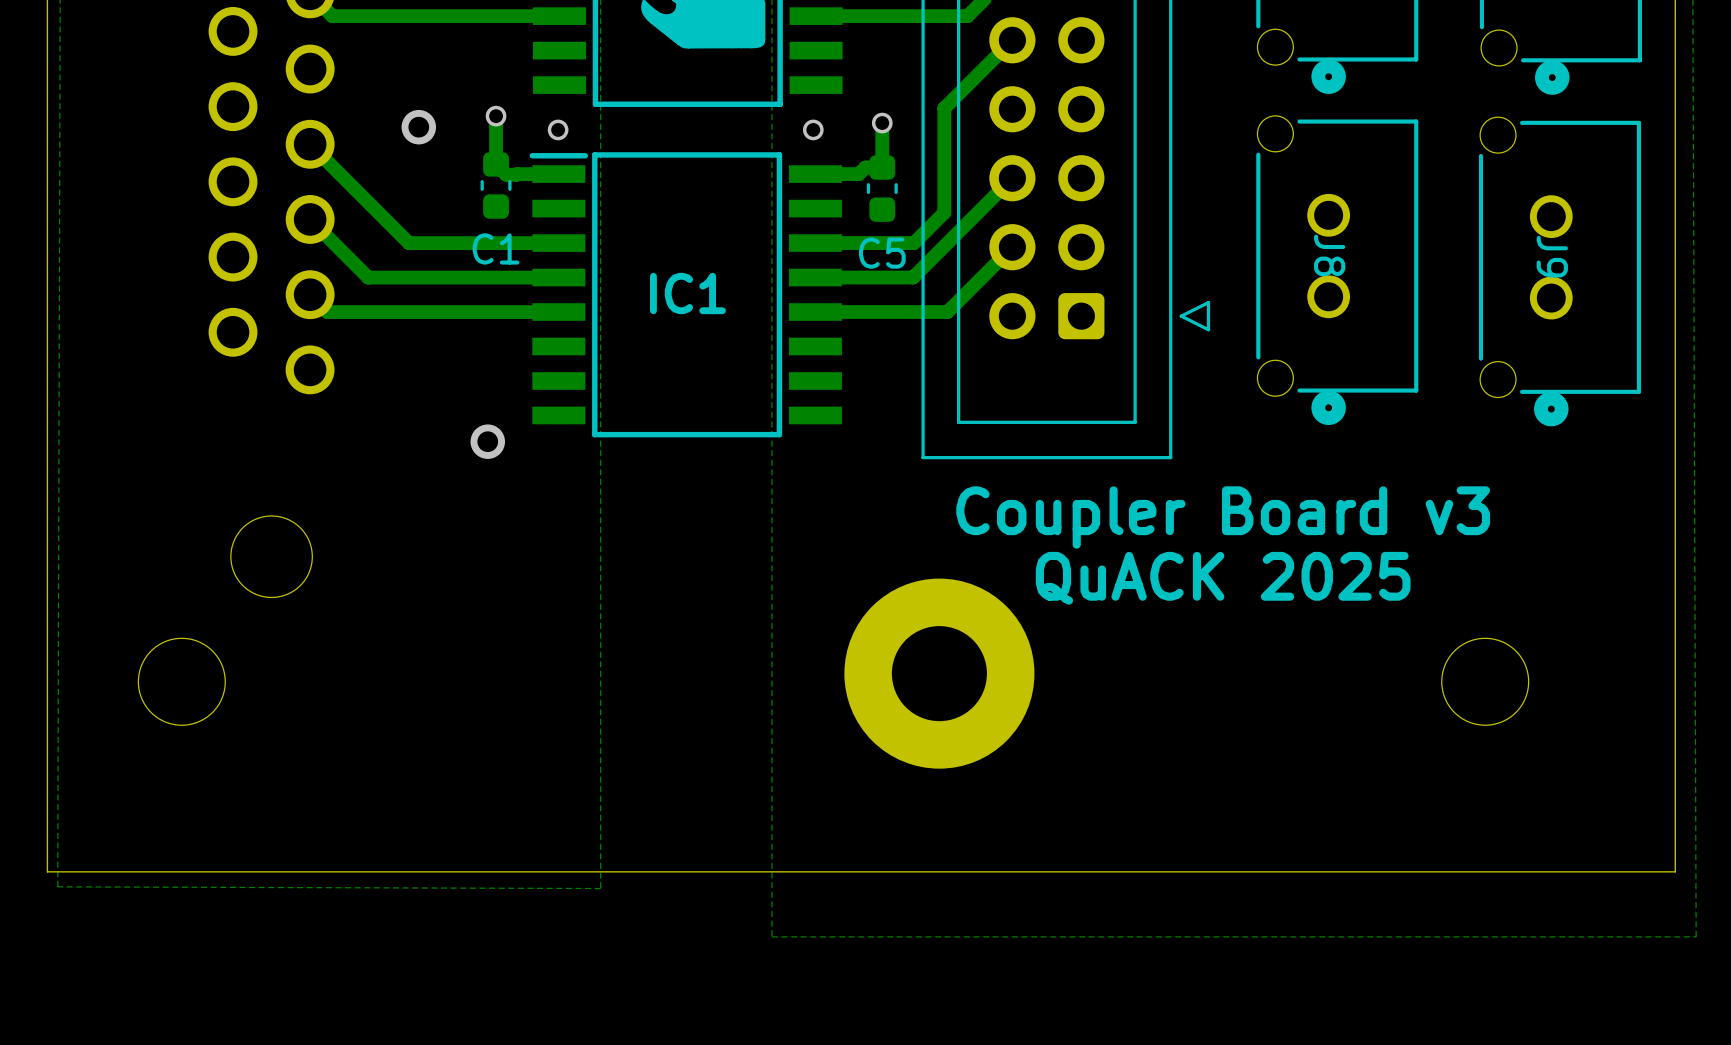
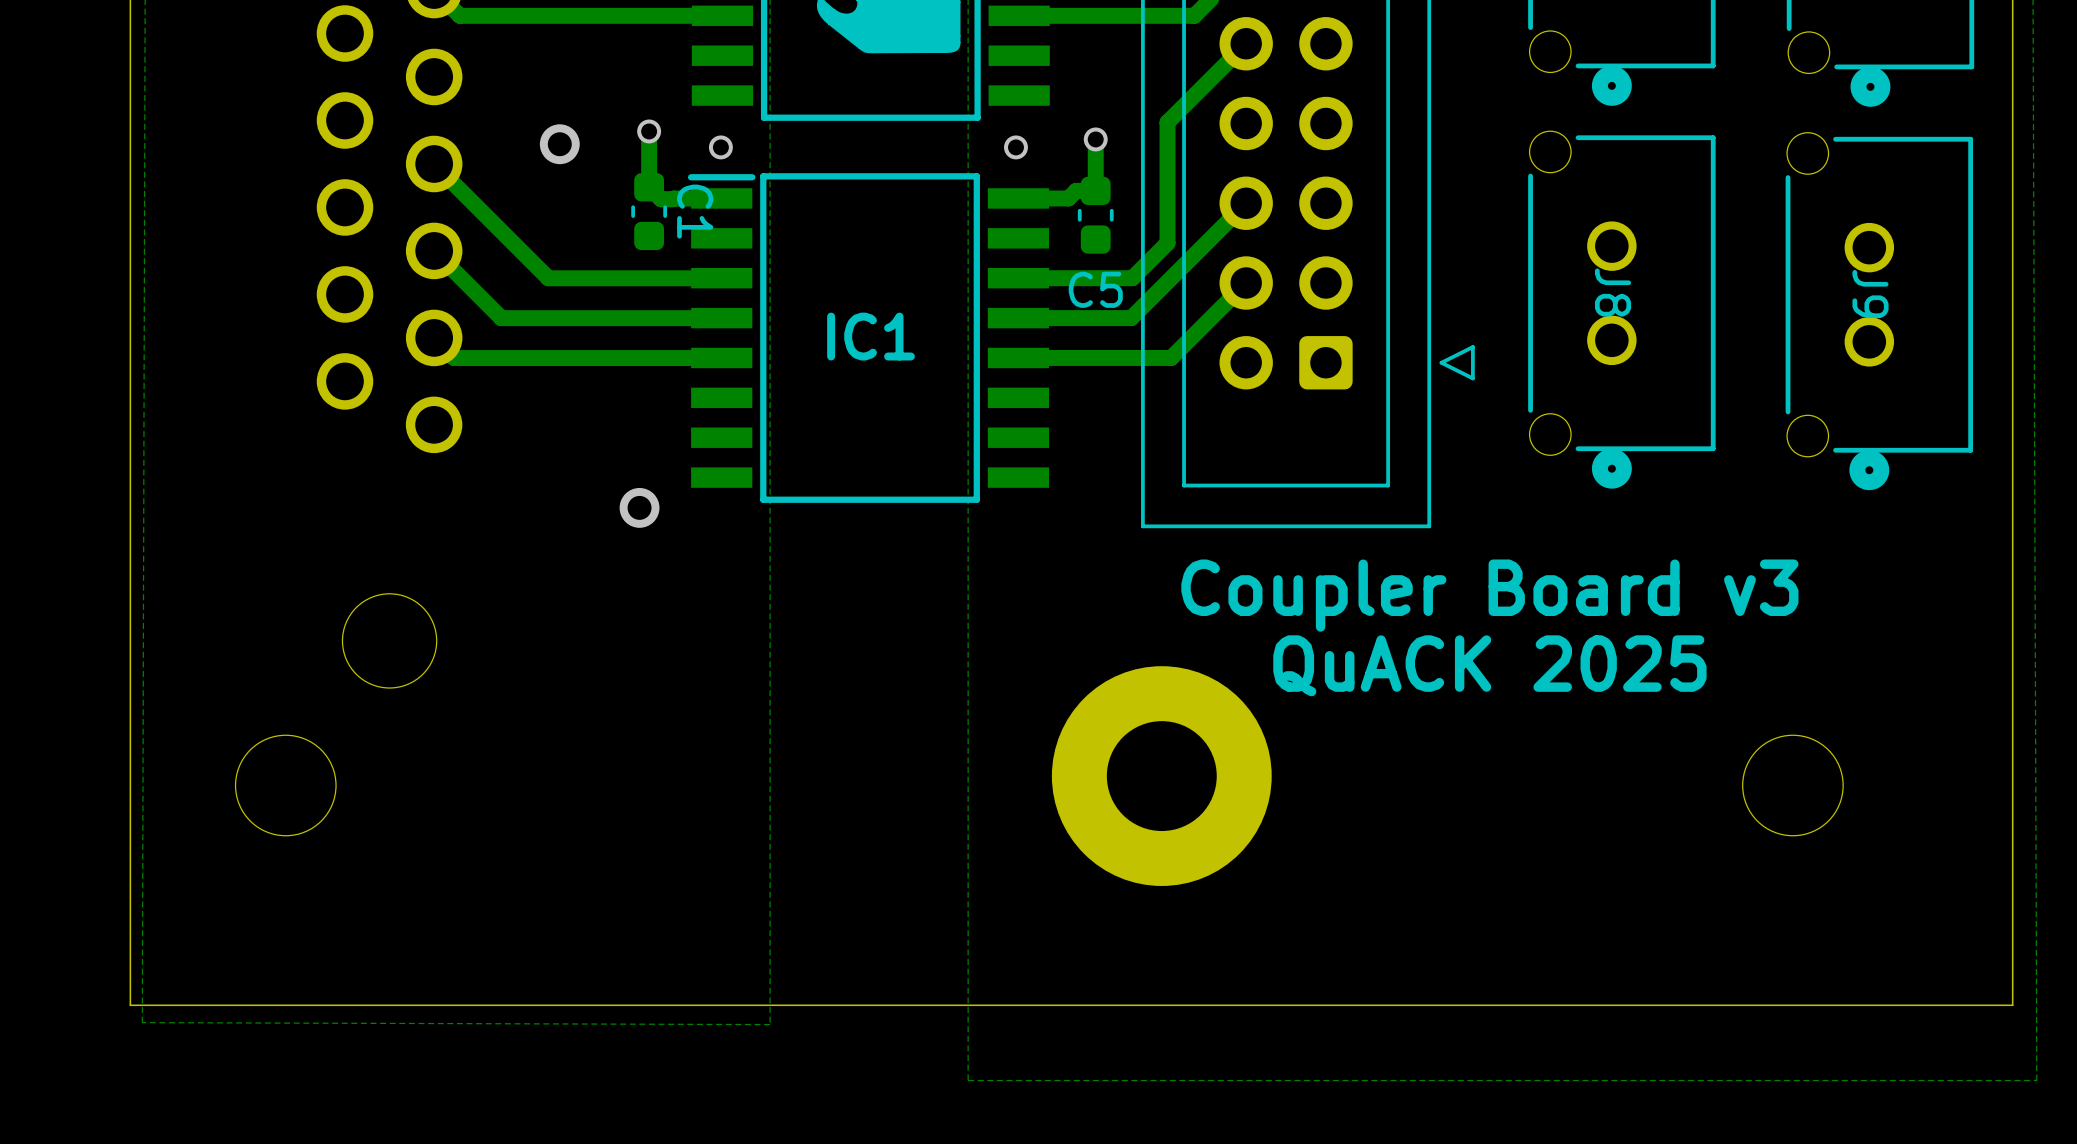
C1 name rotation: 0° (496, 248) -> 90° clockwise (695, 211)
C1 name position: C1 (496, 248) -> C1 (695, 211)

